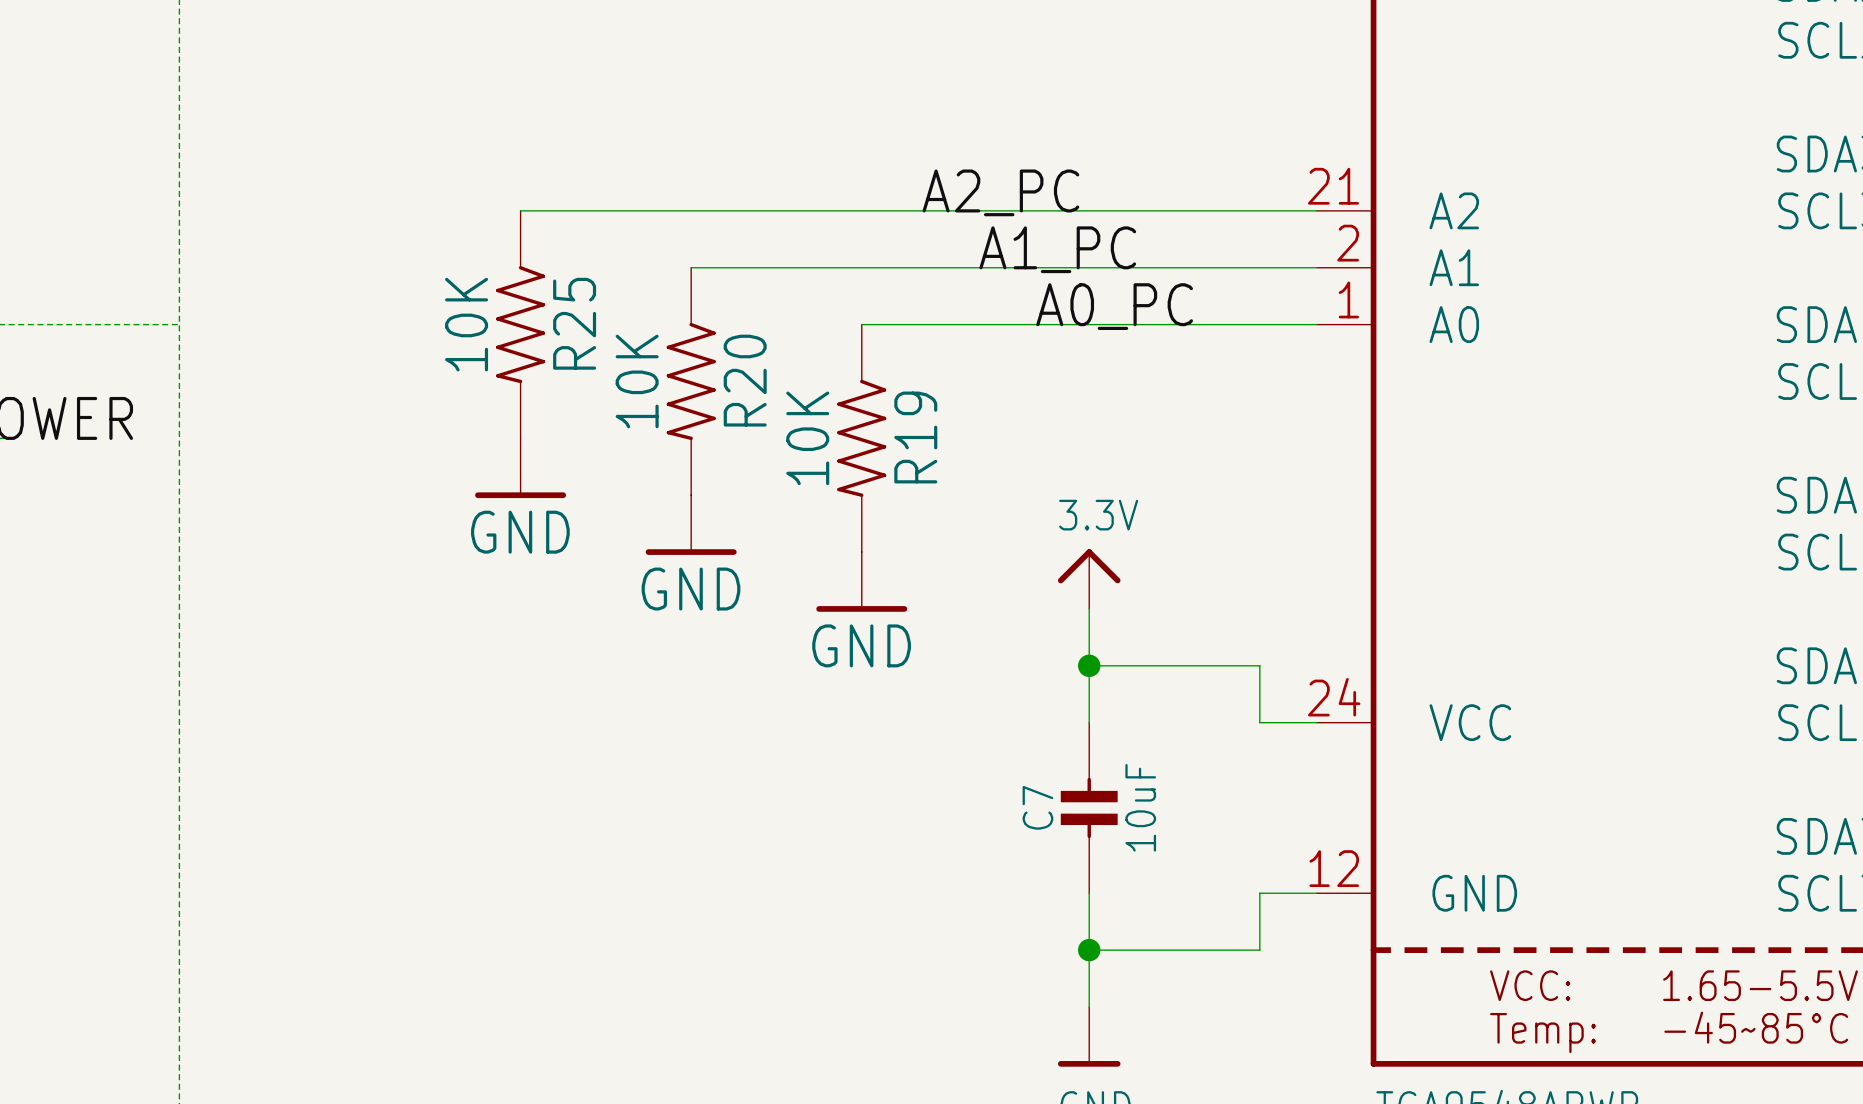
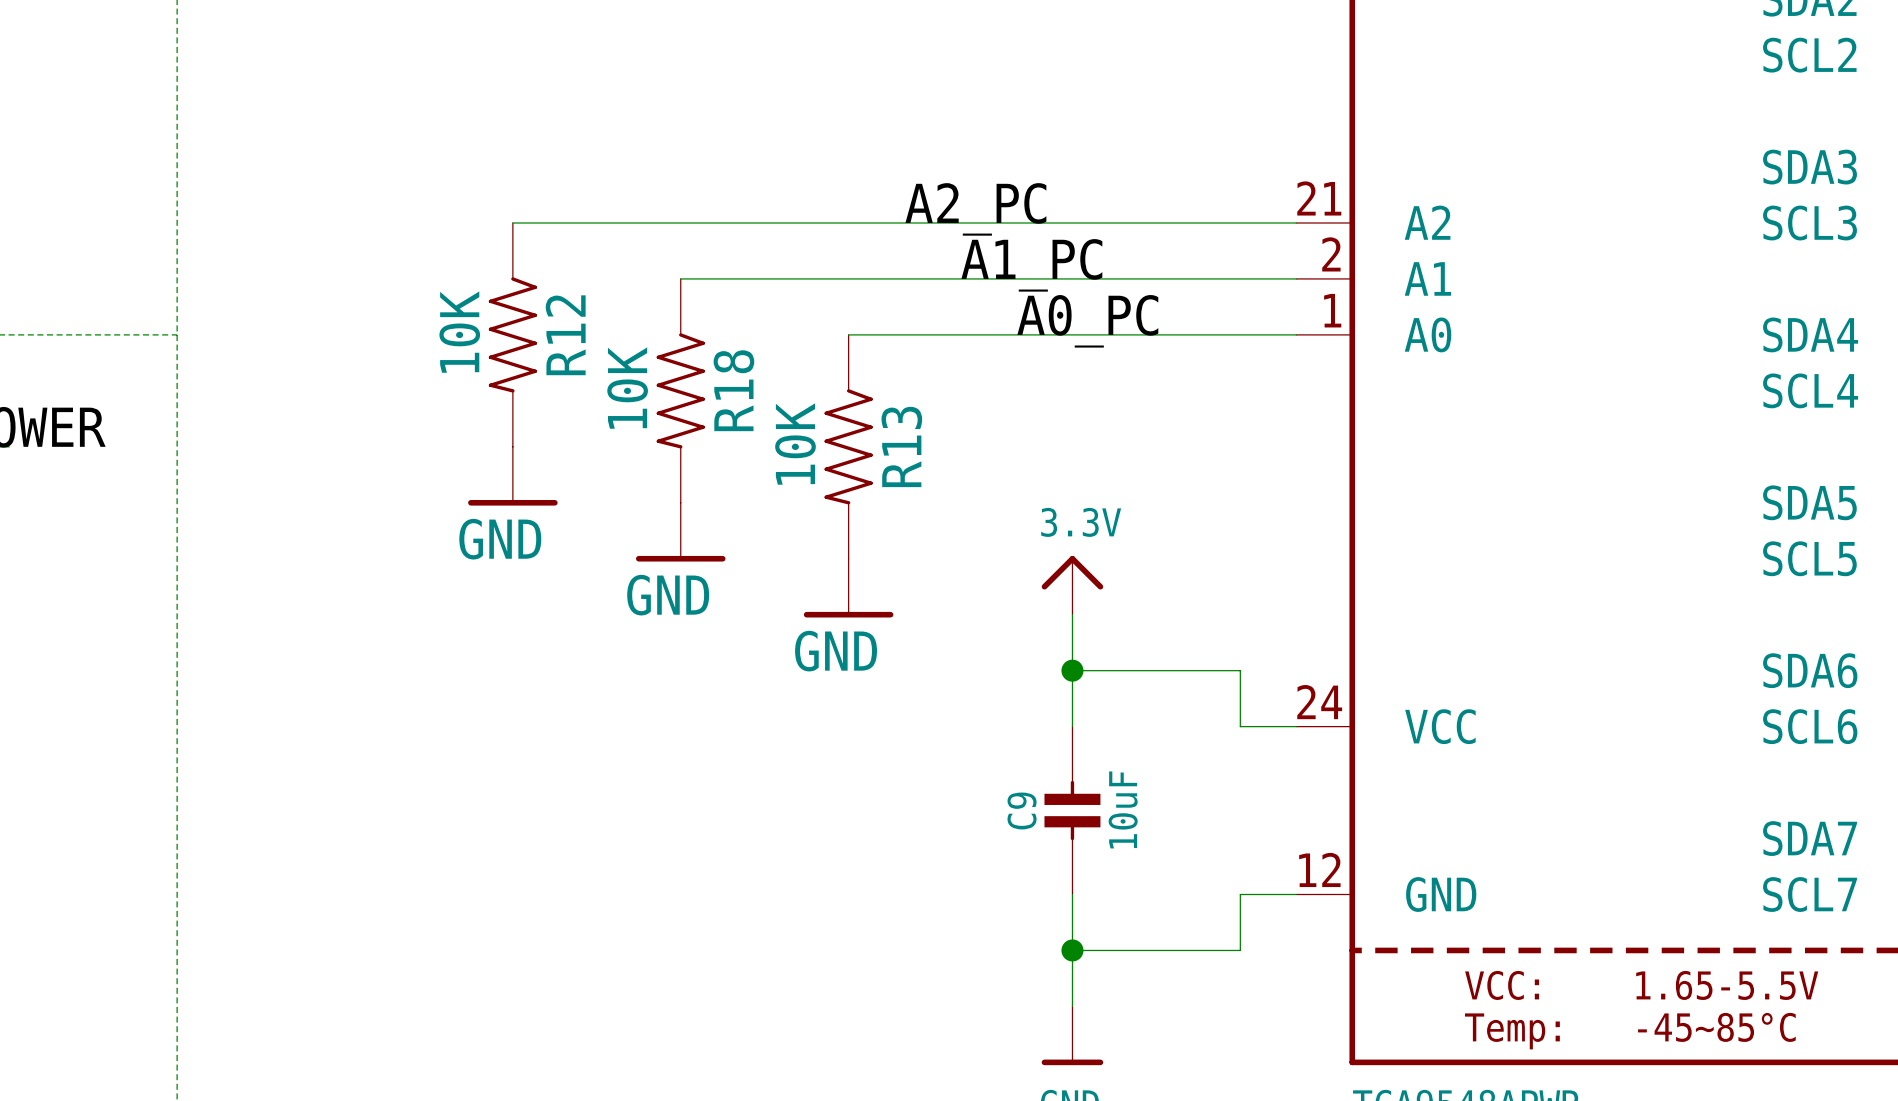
R25 name: R25 (574, 323) -> R12 (565, 335)
R20 name: R20 (745, 380) -> R18 (733, 390)
R19 name: R19 (915, 437) -> R13 (901, 446)
C7 name: C7 (1037, 807) -> C9 (1022, 811)

